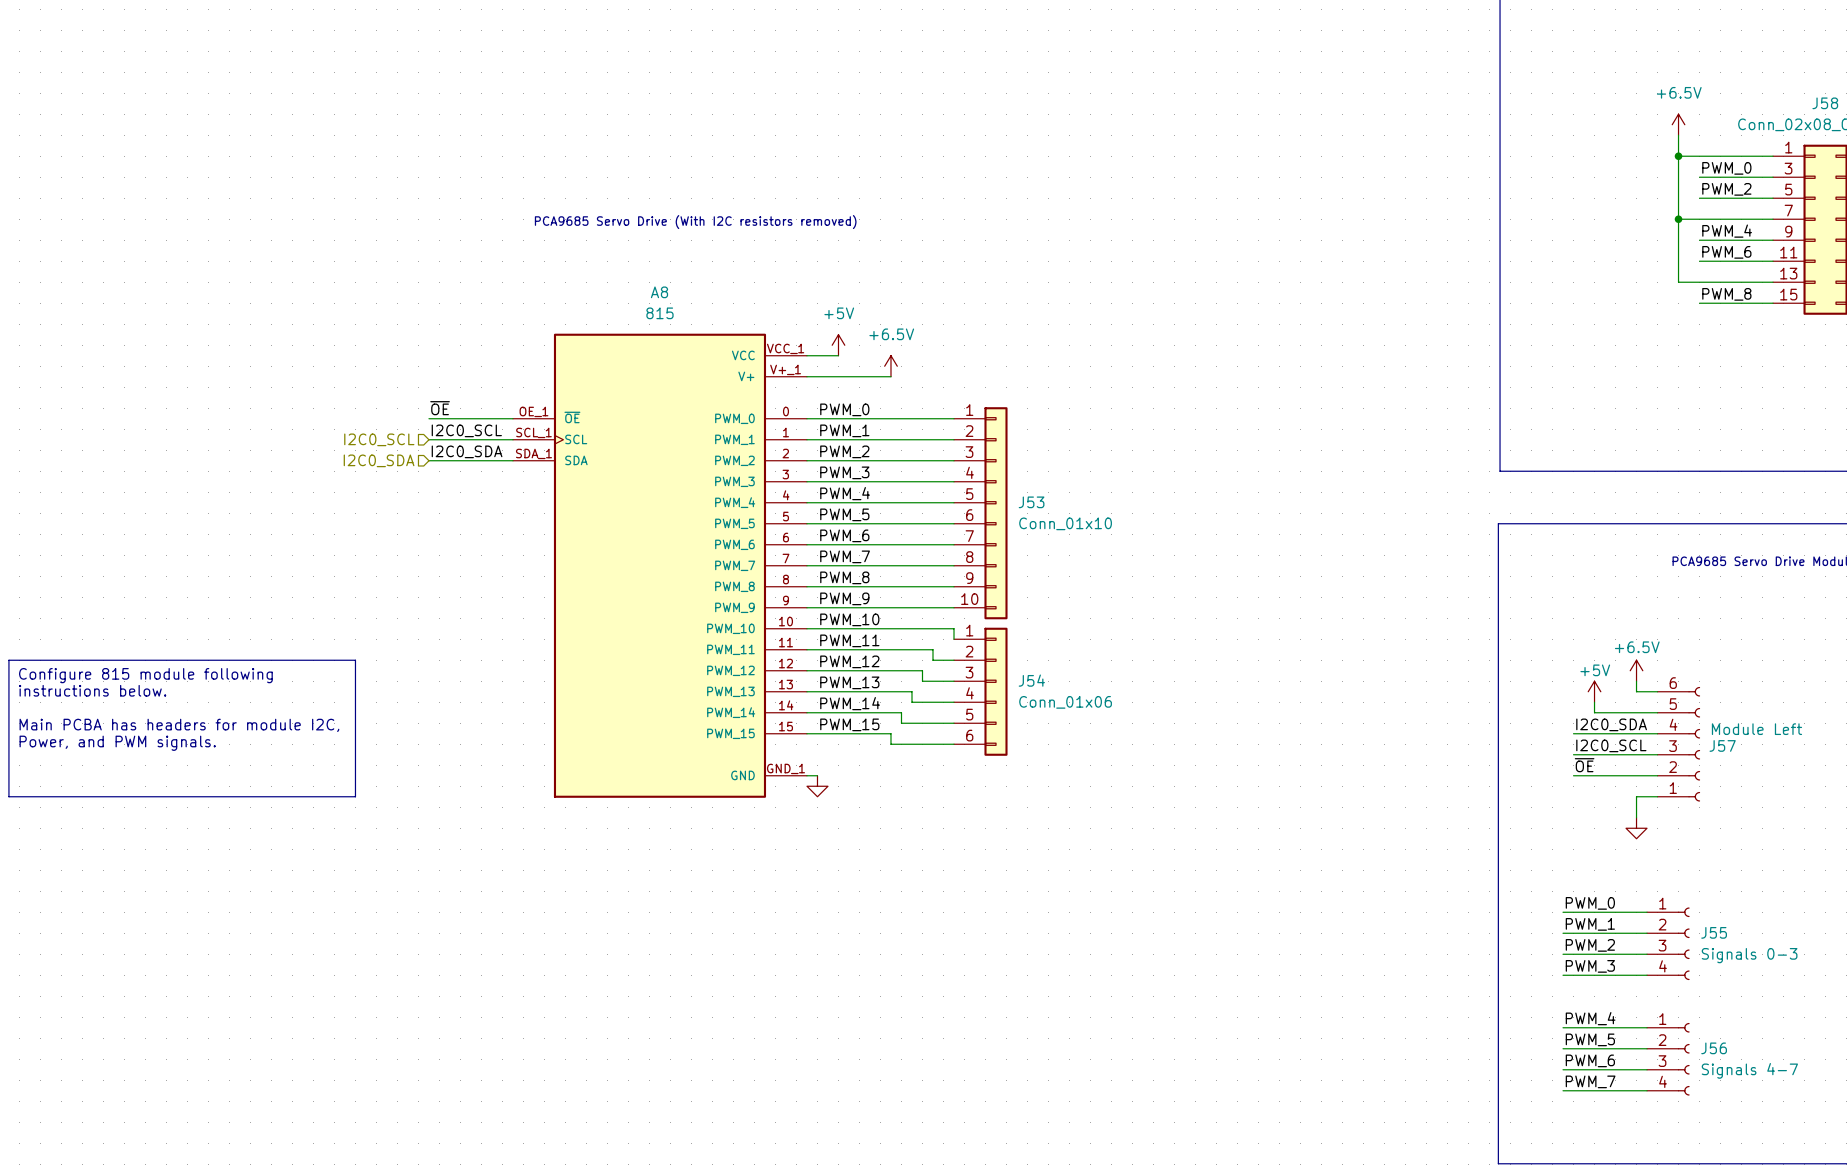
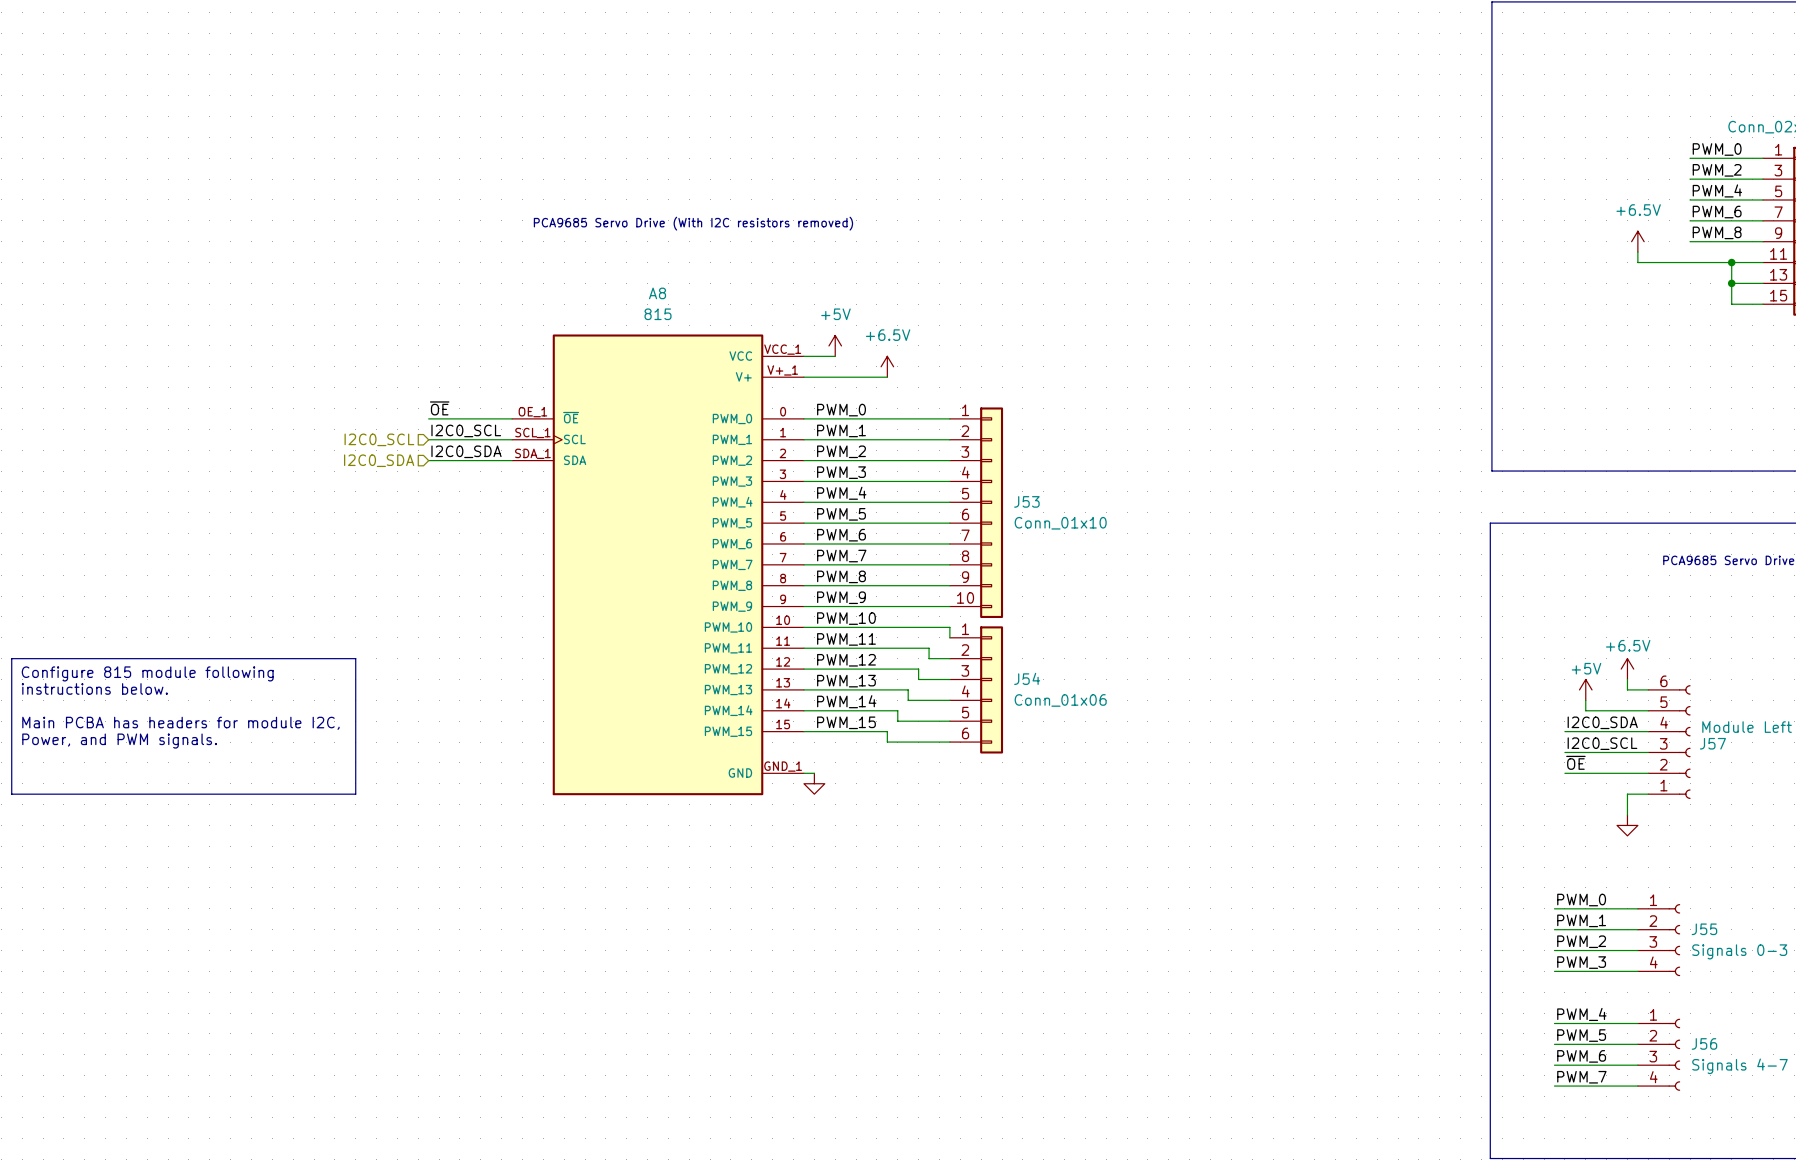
power symbol position: +6.5V (1678, 124) -> +6.5V (1637, 241)
wire: (1678, 135) (1678, 282) (1741, 282) -> none
label: none -> PWM_0 (1717, 149)
wire: (1678, 156) (1699, 156) -> none
junction: (1678, 156) -> none
label: PWM_0 (1726, 168) -> PWM_2 (1717, 170)
label: PWM_2 (1726, 189) -> PWM_4 (1717, 190)
wire: (1678, 219) (1699, 219) -> none
junction: (1678, 219) -> none
label: PWM_4 (1727, 231) -> PWM_8 (1717, 232)
wire: none -> (1637, 252) (1637, 262) (1690, 262)
label position: PWM_6 (1726, 252) -> PWM_6 (1717, 212)
junction: none -> (1731, 262)
junction: none -> (1731, 283)
label: PWM_8 (1726, 294) -> none
wire: (1699, 303) (1741, 303) -> (1731, 262) (1731, 304)

